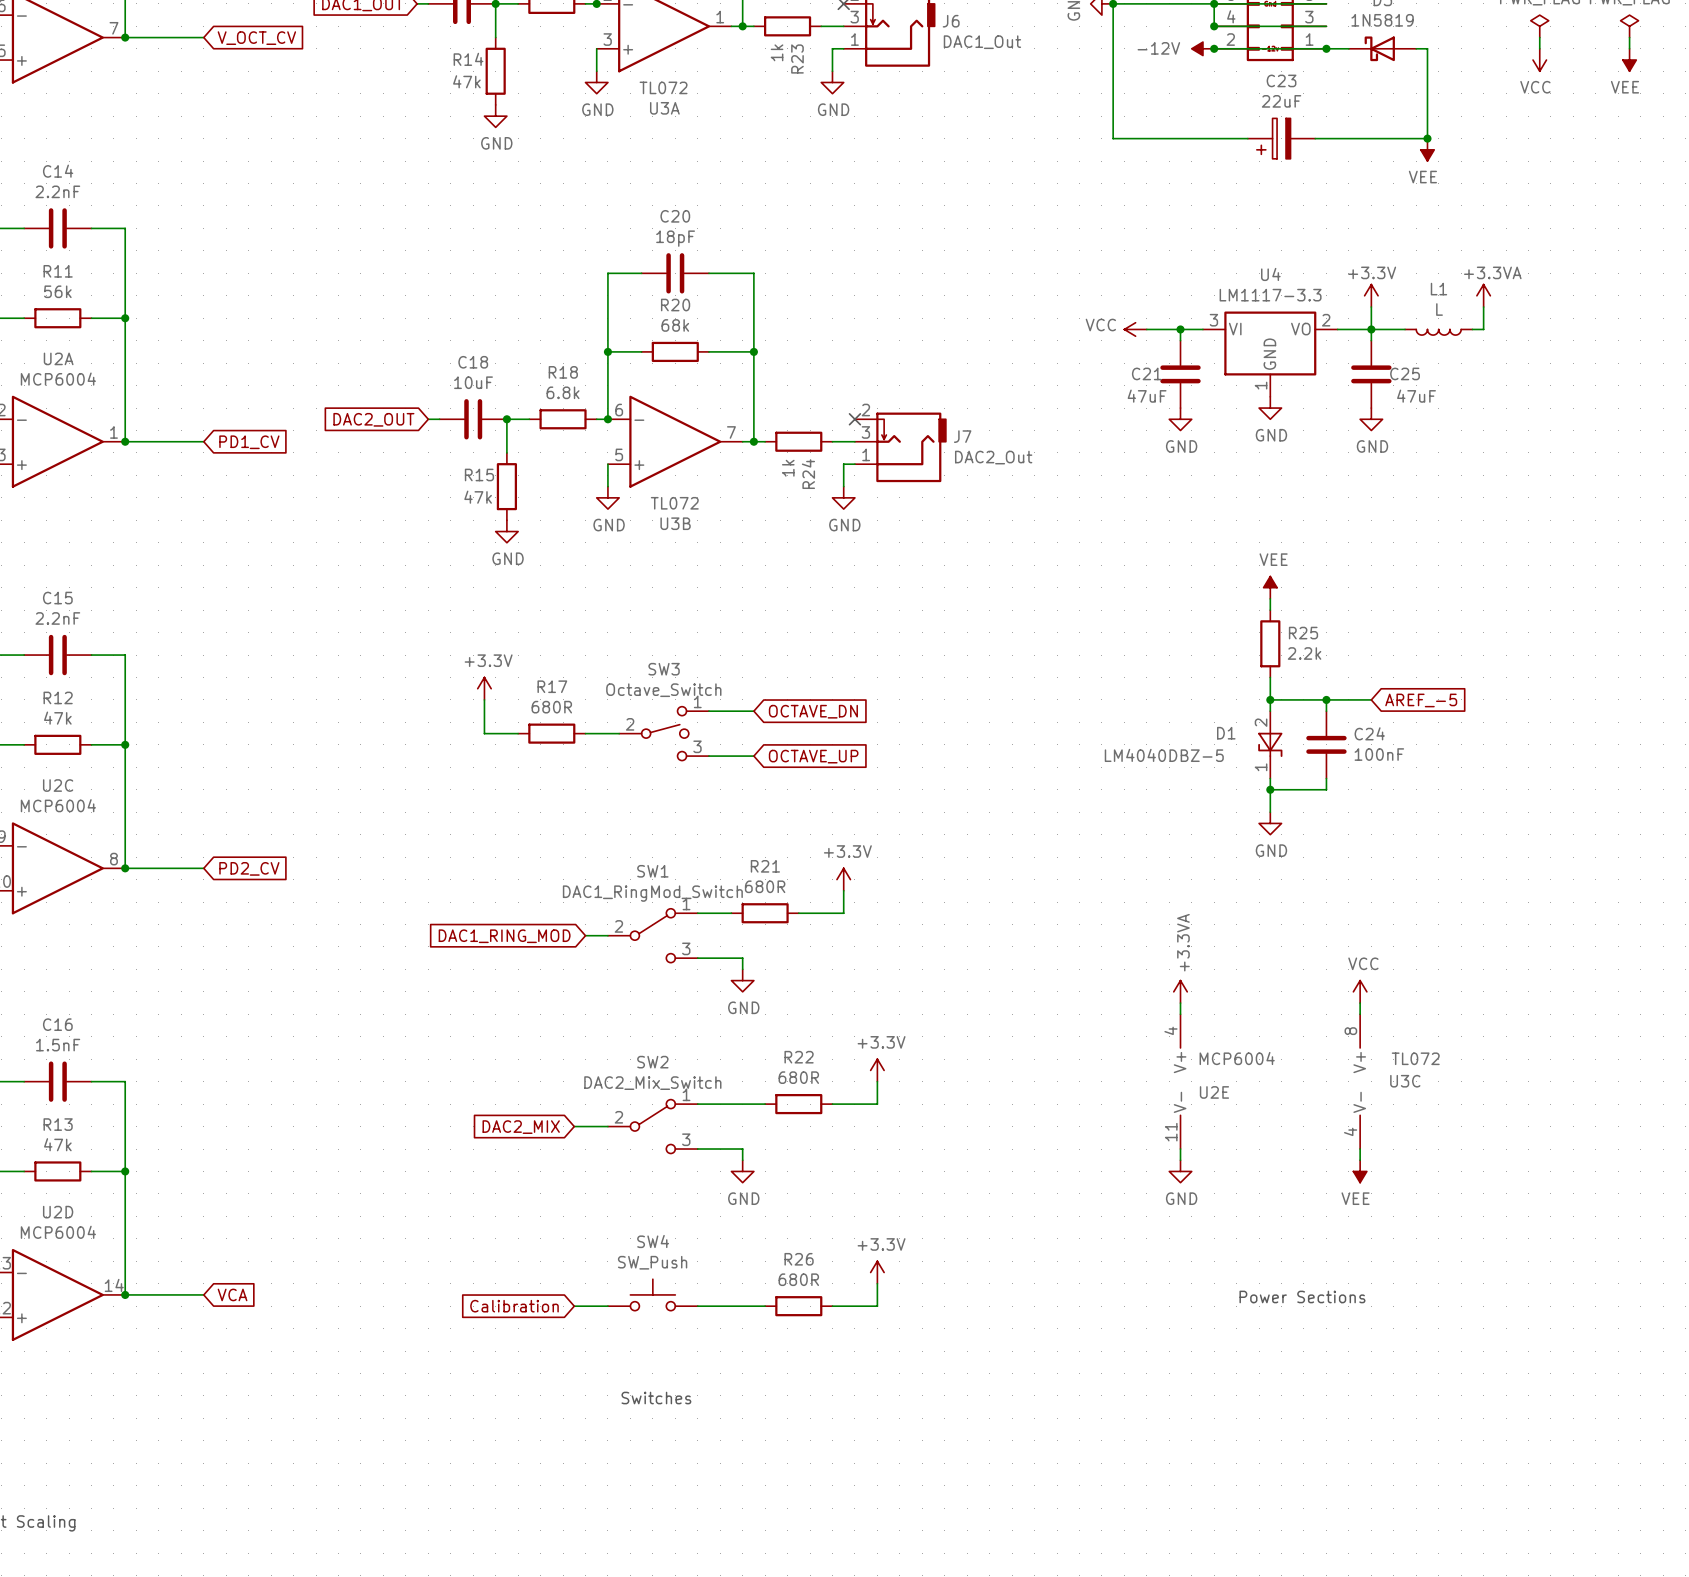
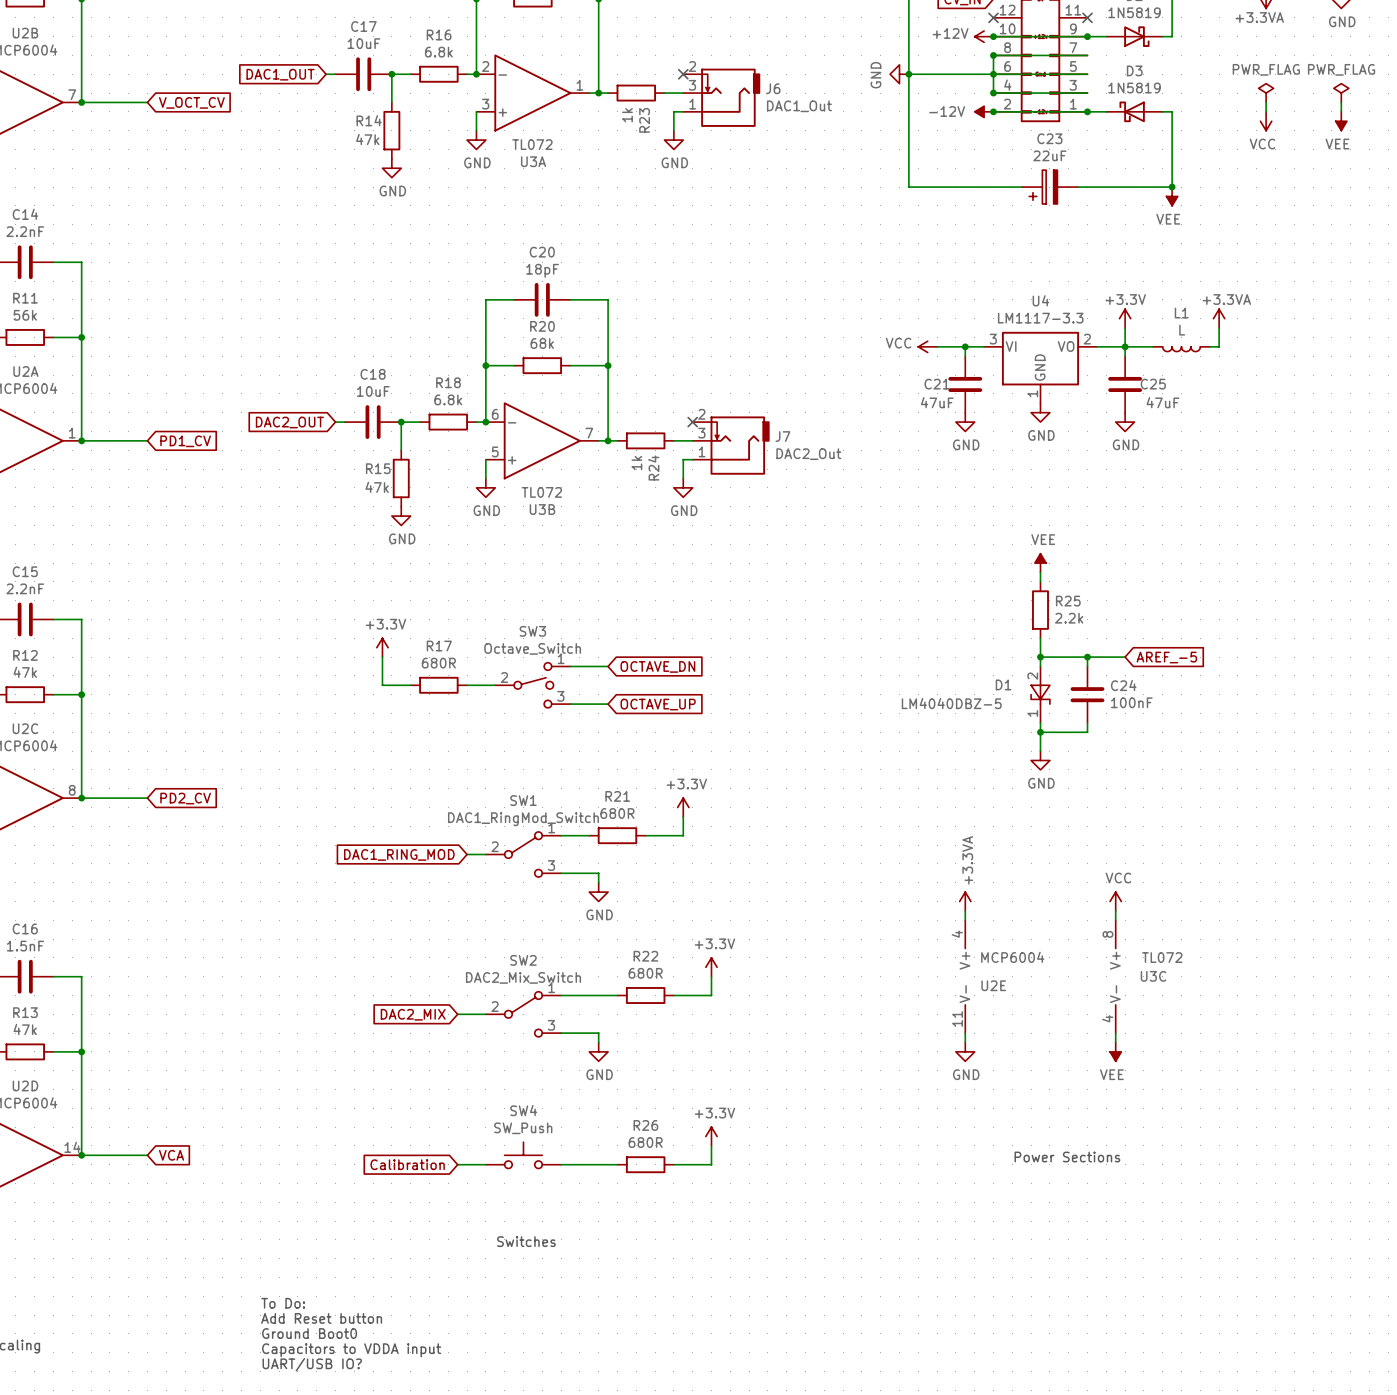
text: none -> To Do: (283, 1303)
text: none -> Add Reset button (321, 1318)
text: none -> Ground Boot0 (309, 1333)
text: none -> Capacitors to VDDA input (351, 1350)
text: none -> UART/USB IO? (312, 1364)

